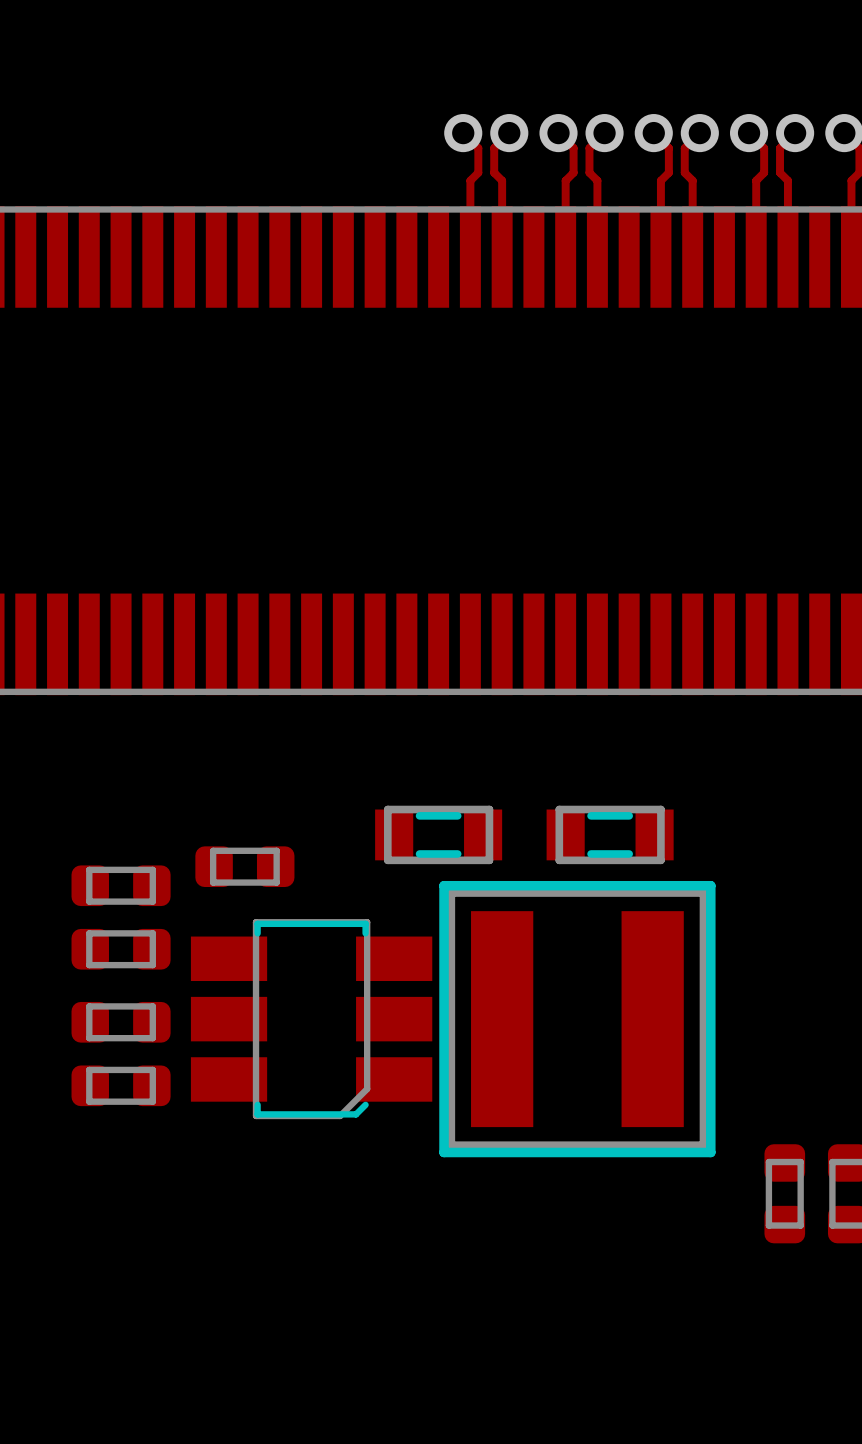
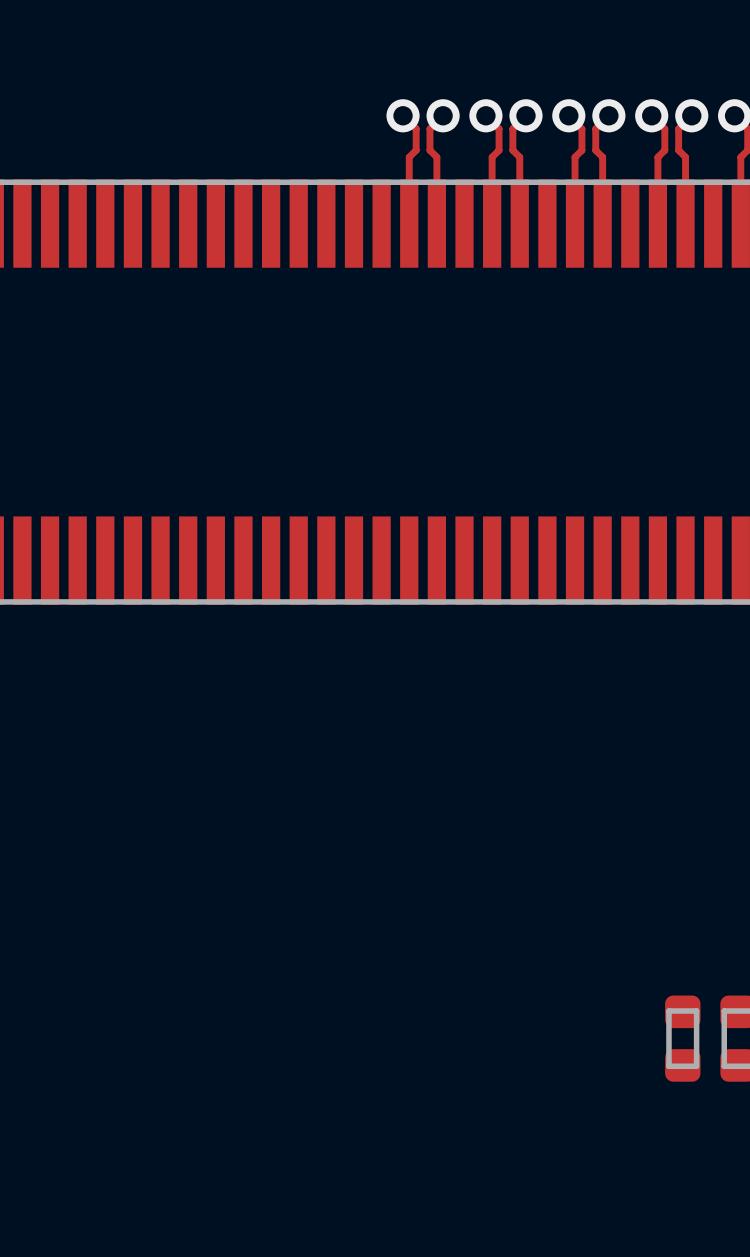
part: (438, 834) -> none
part: (610, 834) -> none
part: (244, 866) -> none
part: (121, 885) -> none
part: (121, 949) -> none
part: (311, 1019) -> none
part: (577, 1019) -> none
part: (121, 1022) -> none
part: (121, 1085) -> none

